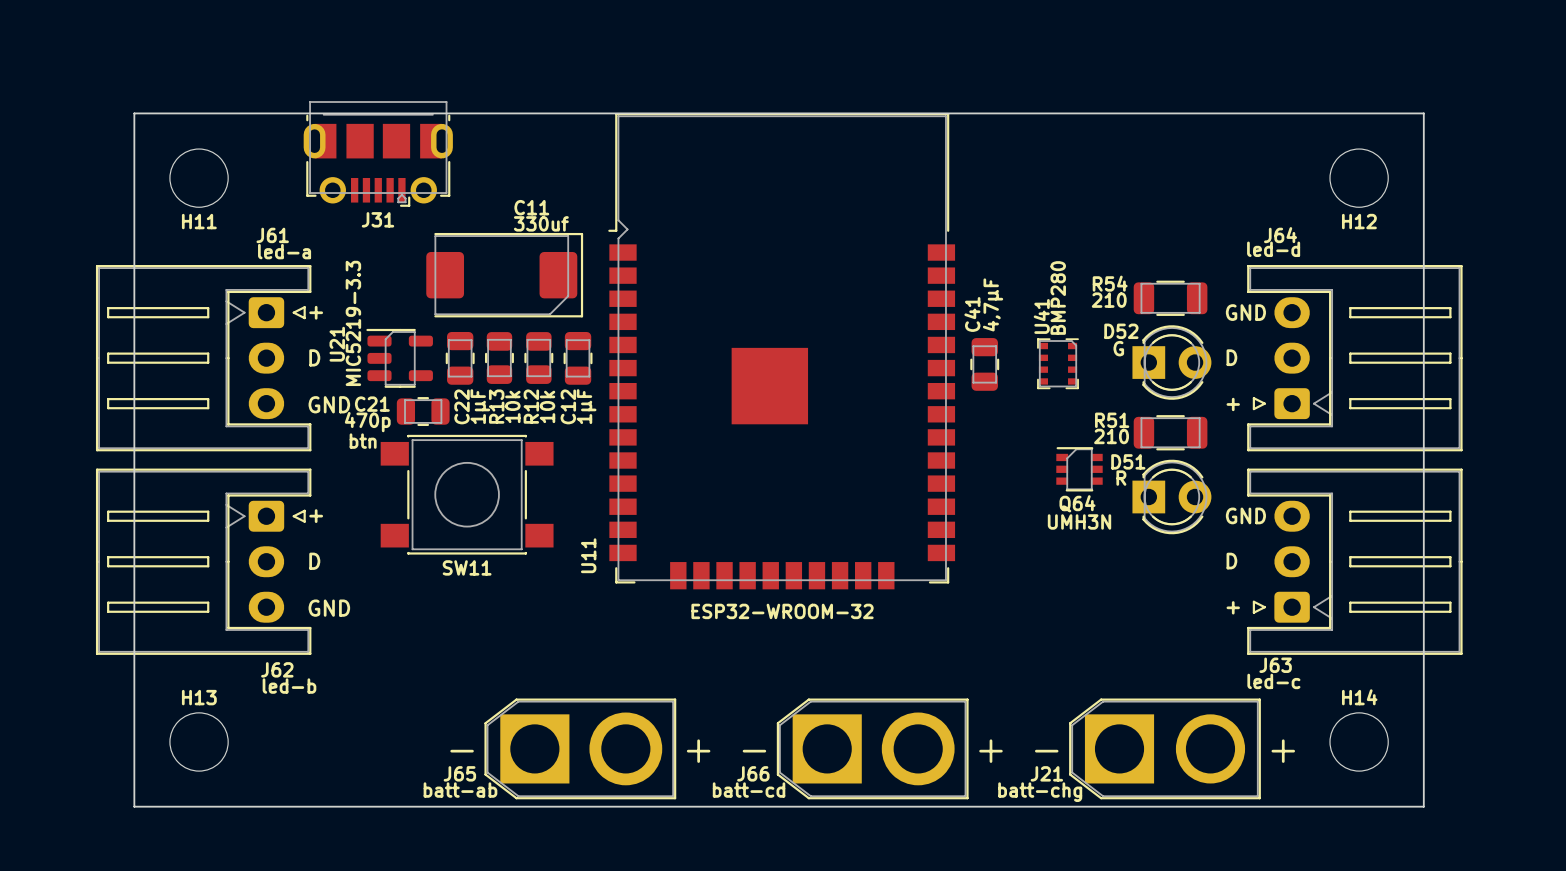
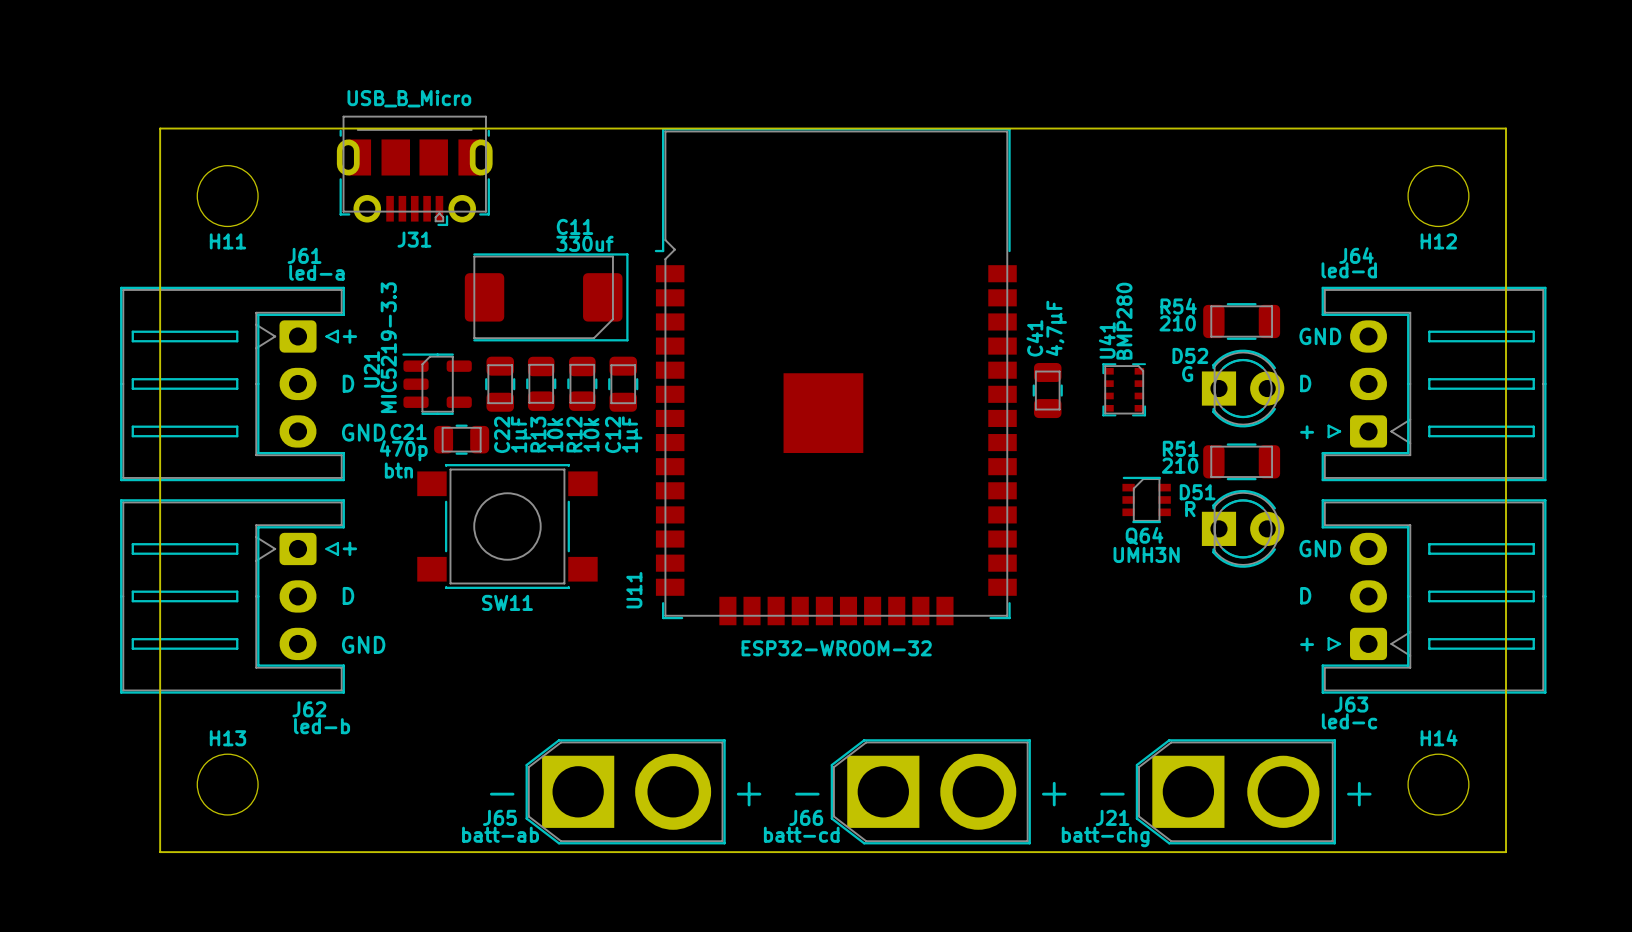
J31 value: none -> USB_B_Micro (409, 98)

